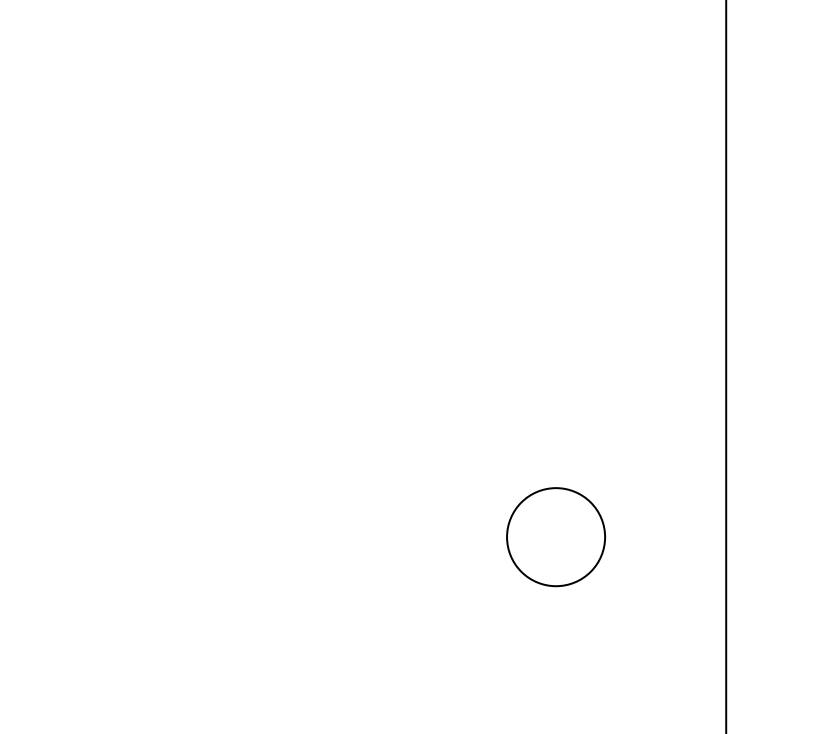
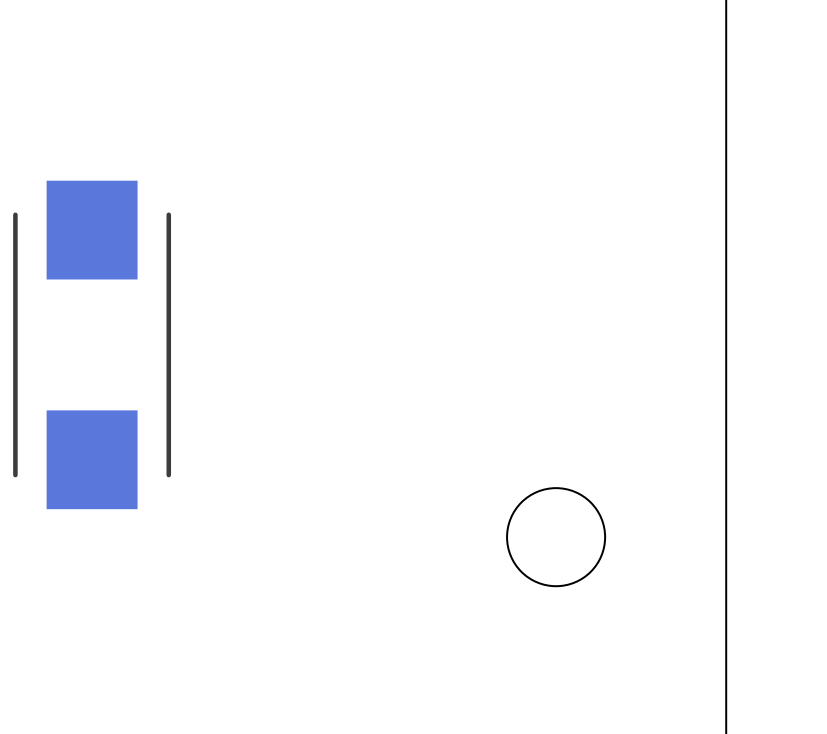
part: none -> (92, 344)

